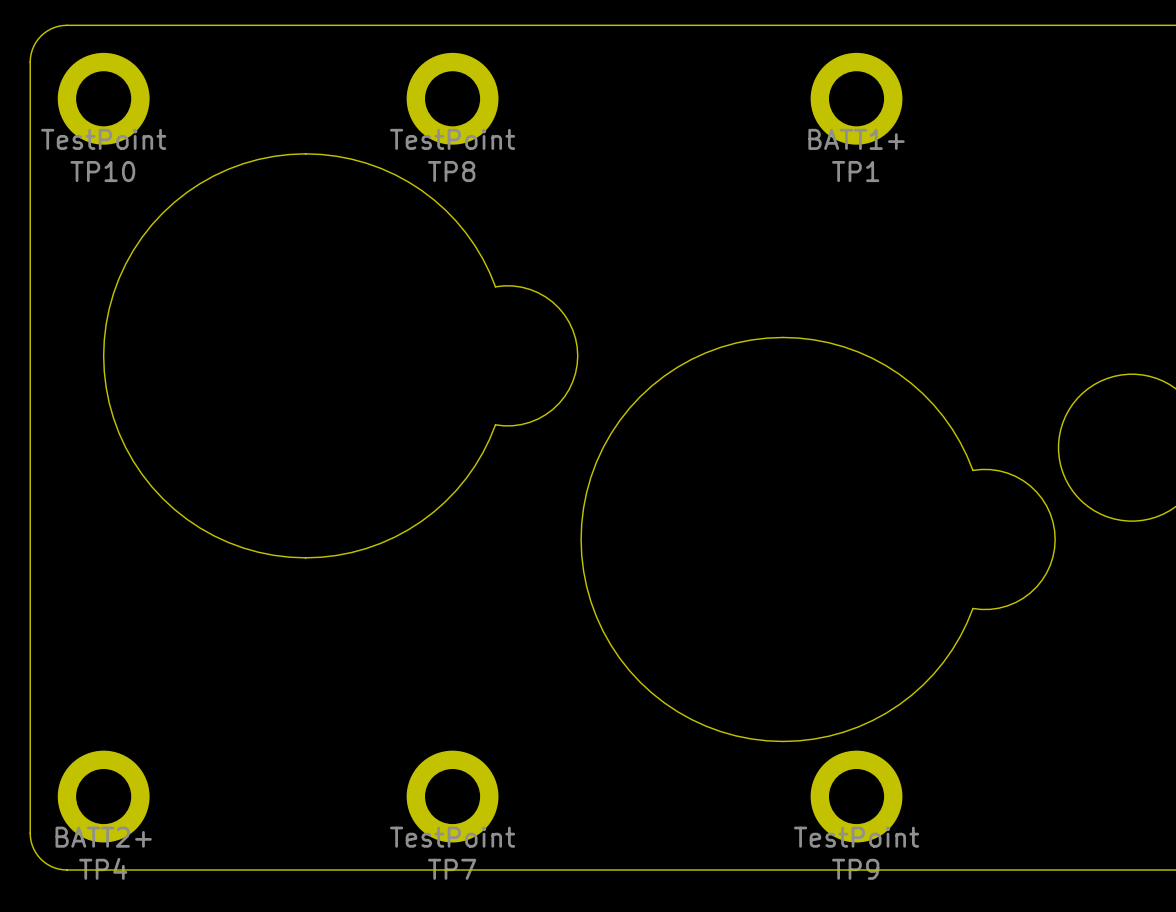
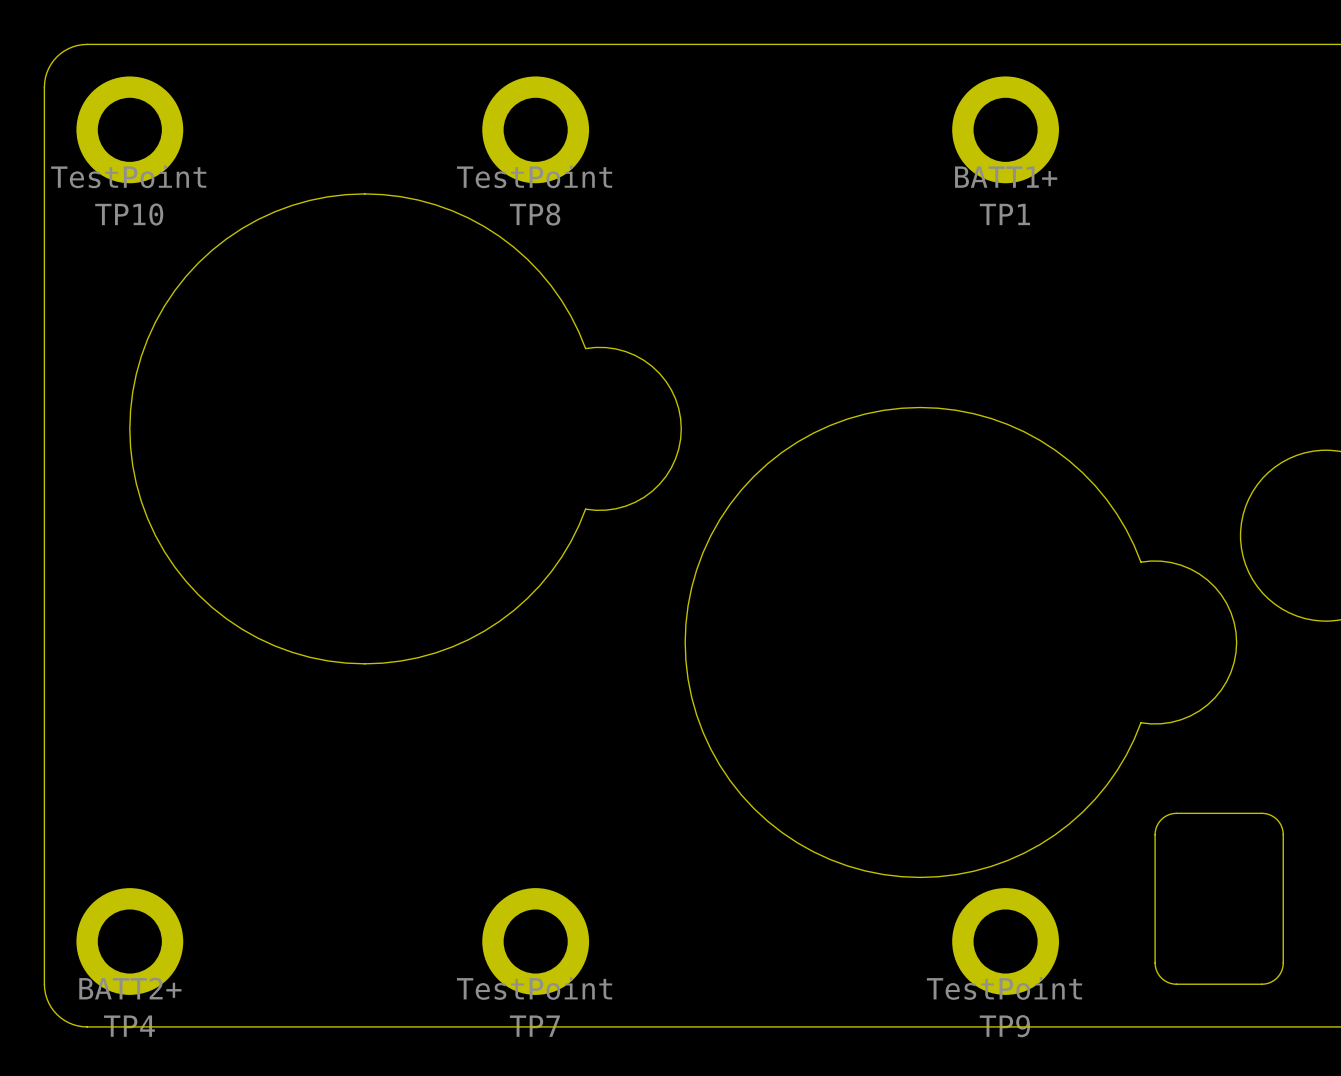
board edge: none -> (1176, 813) (1264, 813) (1273, 816) (1279, 823) (1283, 834) (1283, 962) (1281, 972) (1273, 980) (1261, 984) (1174, 984) (1165, 980) (1158, 974) (1155, 962) (1155, 832) (1158, 823) (1163, 818) (1176, 813)

